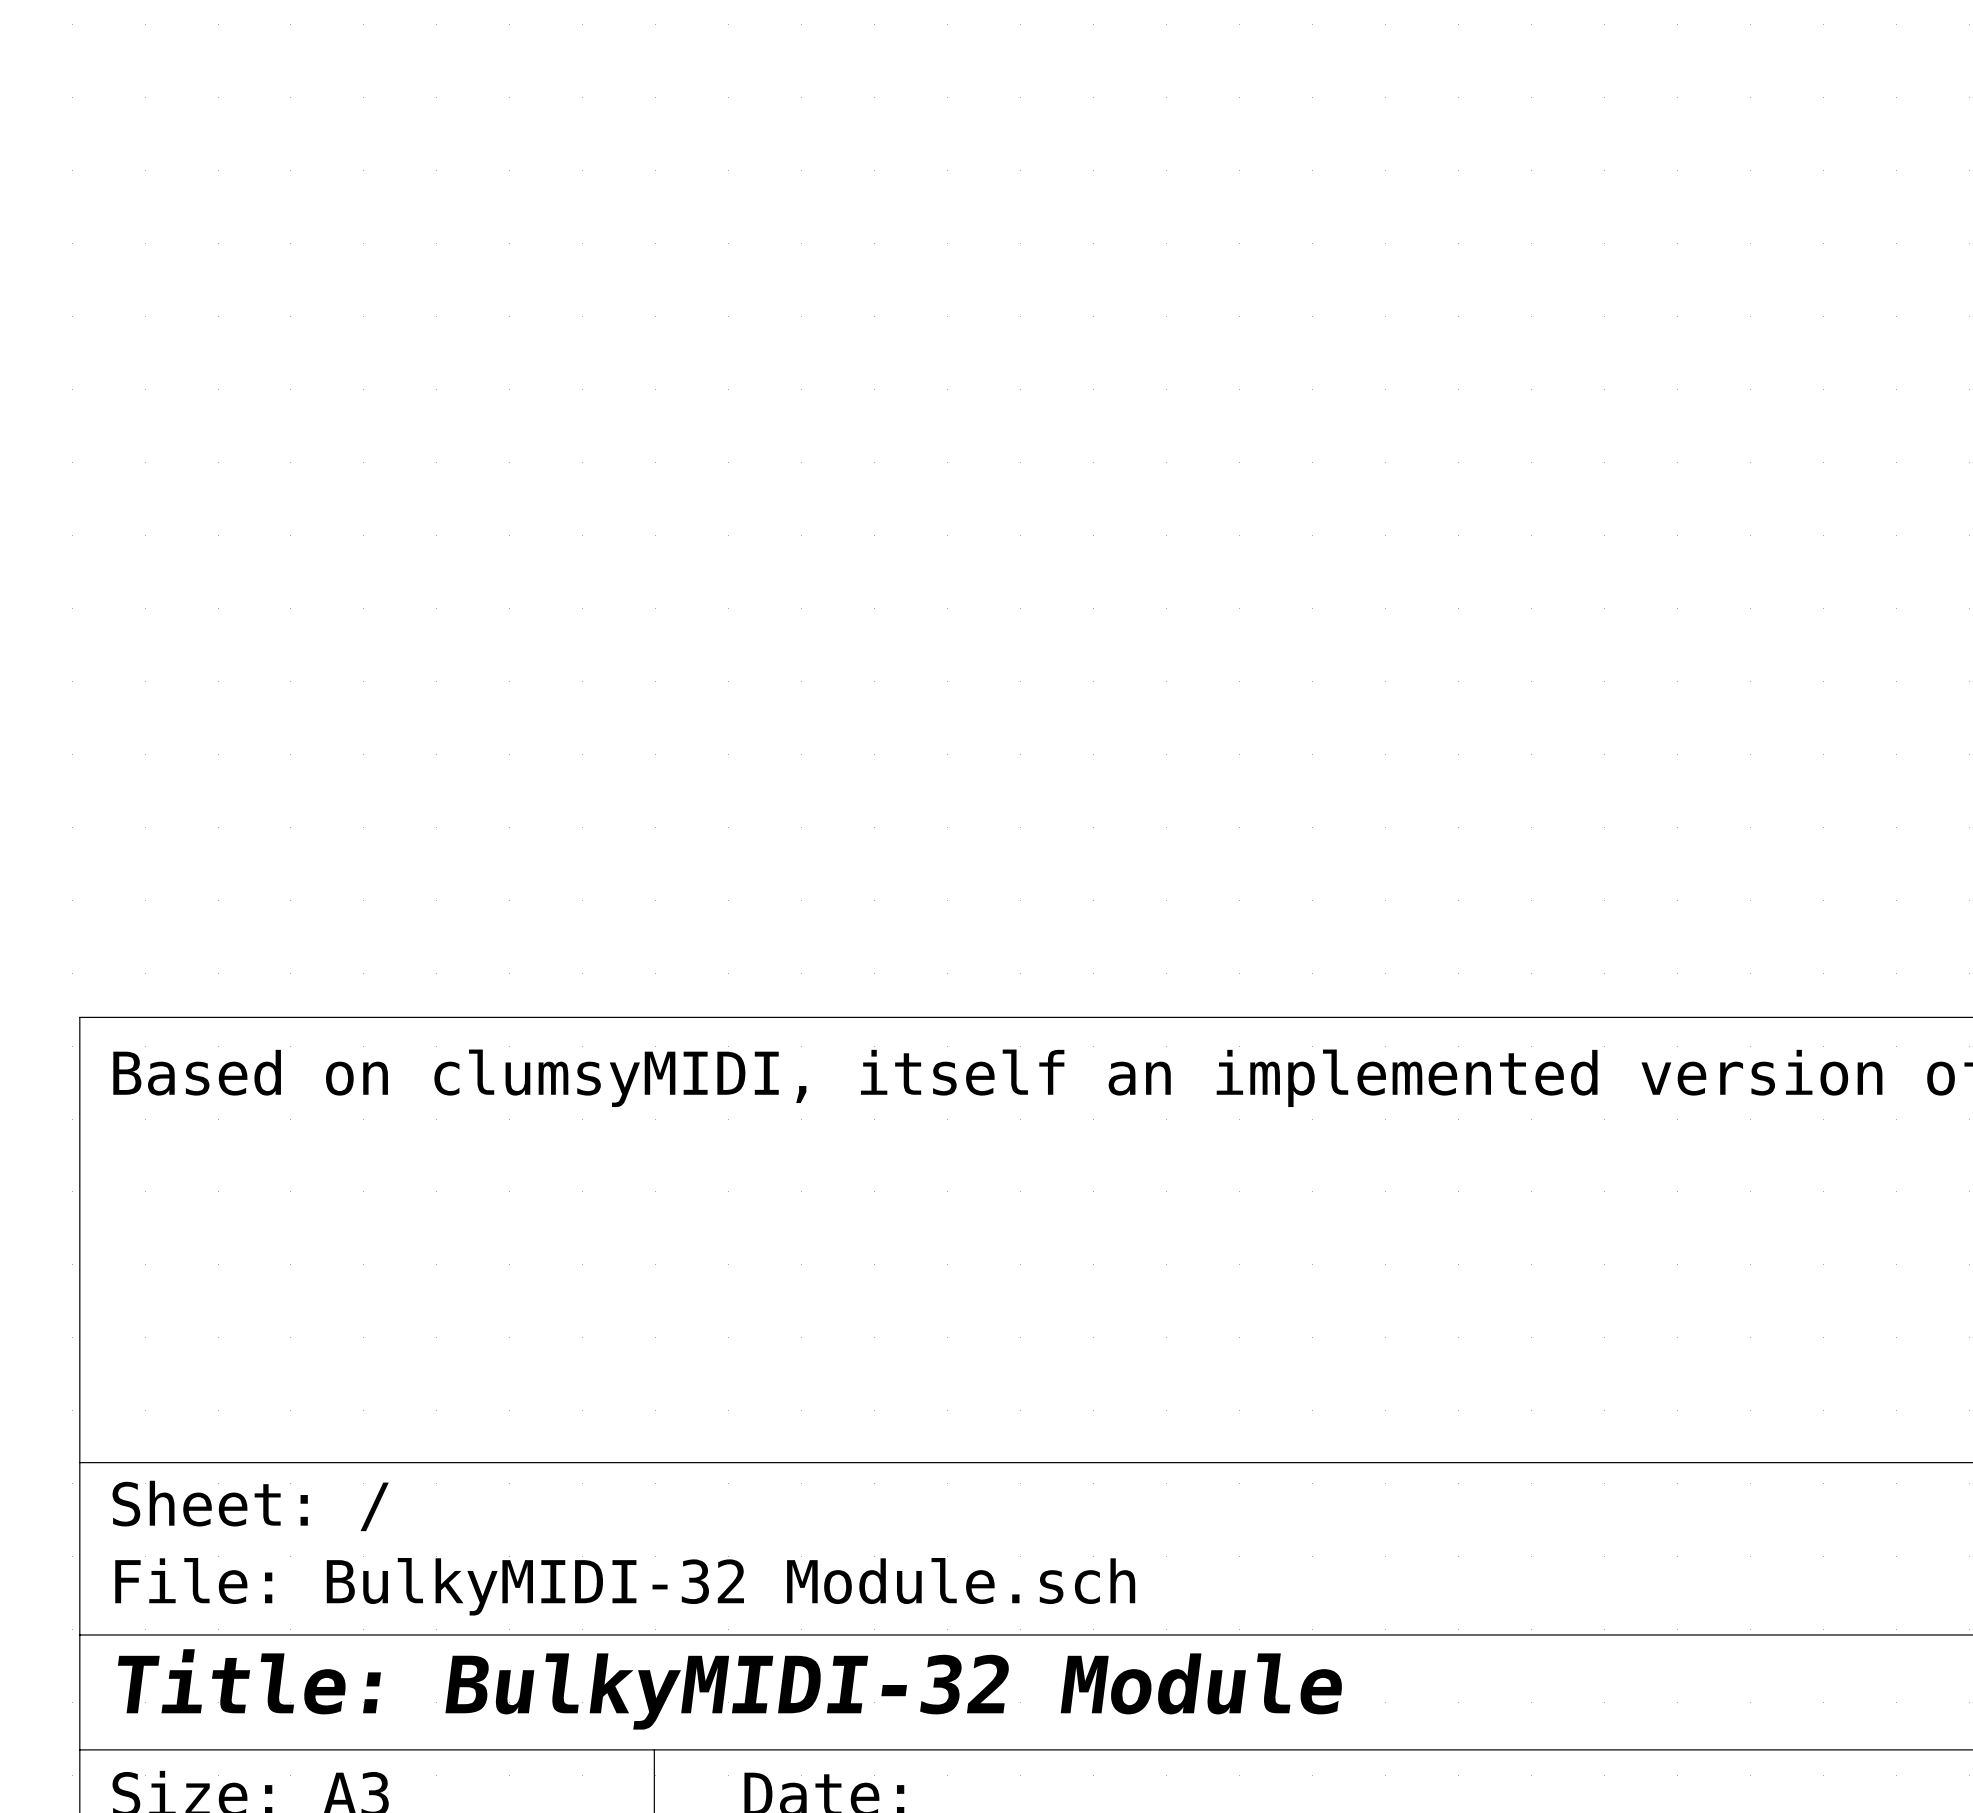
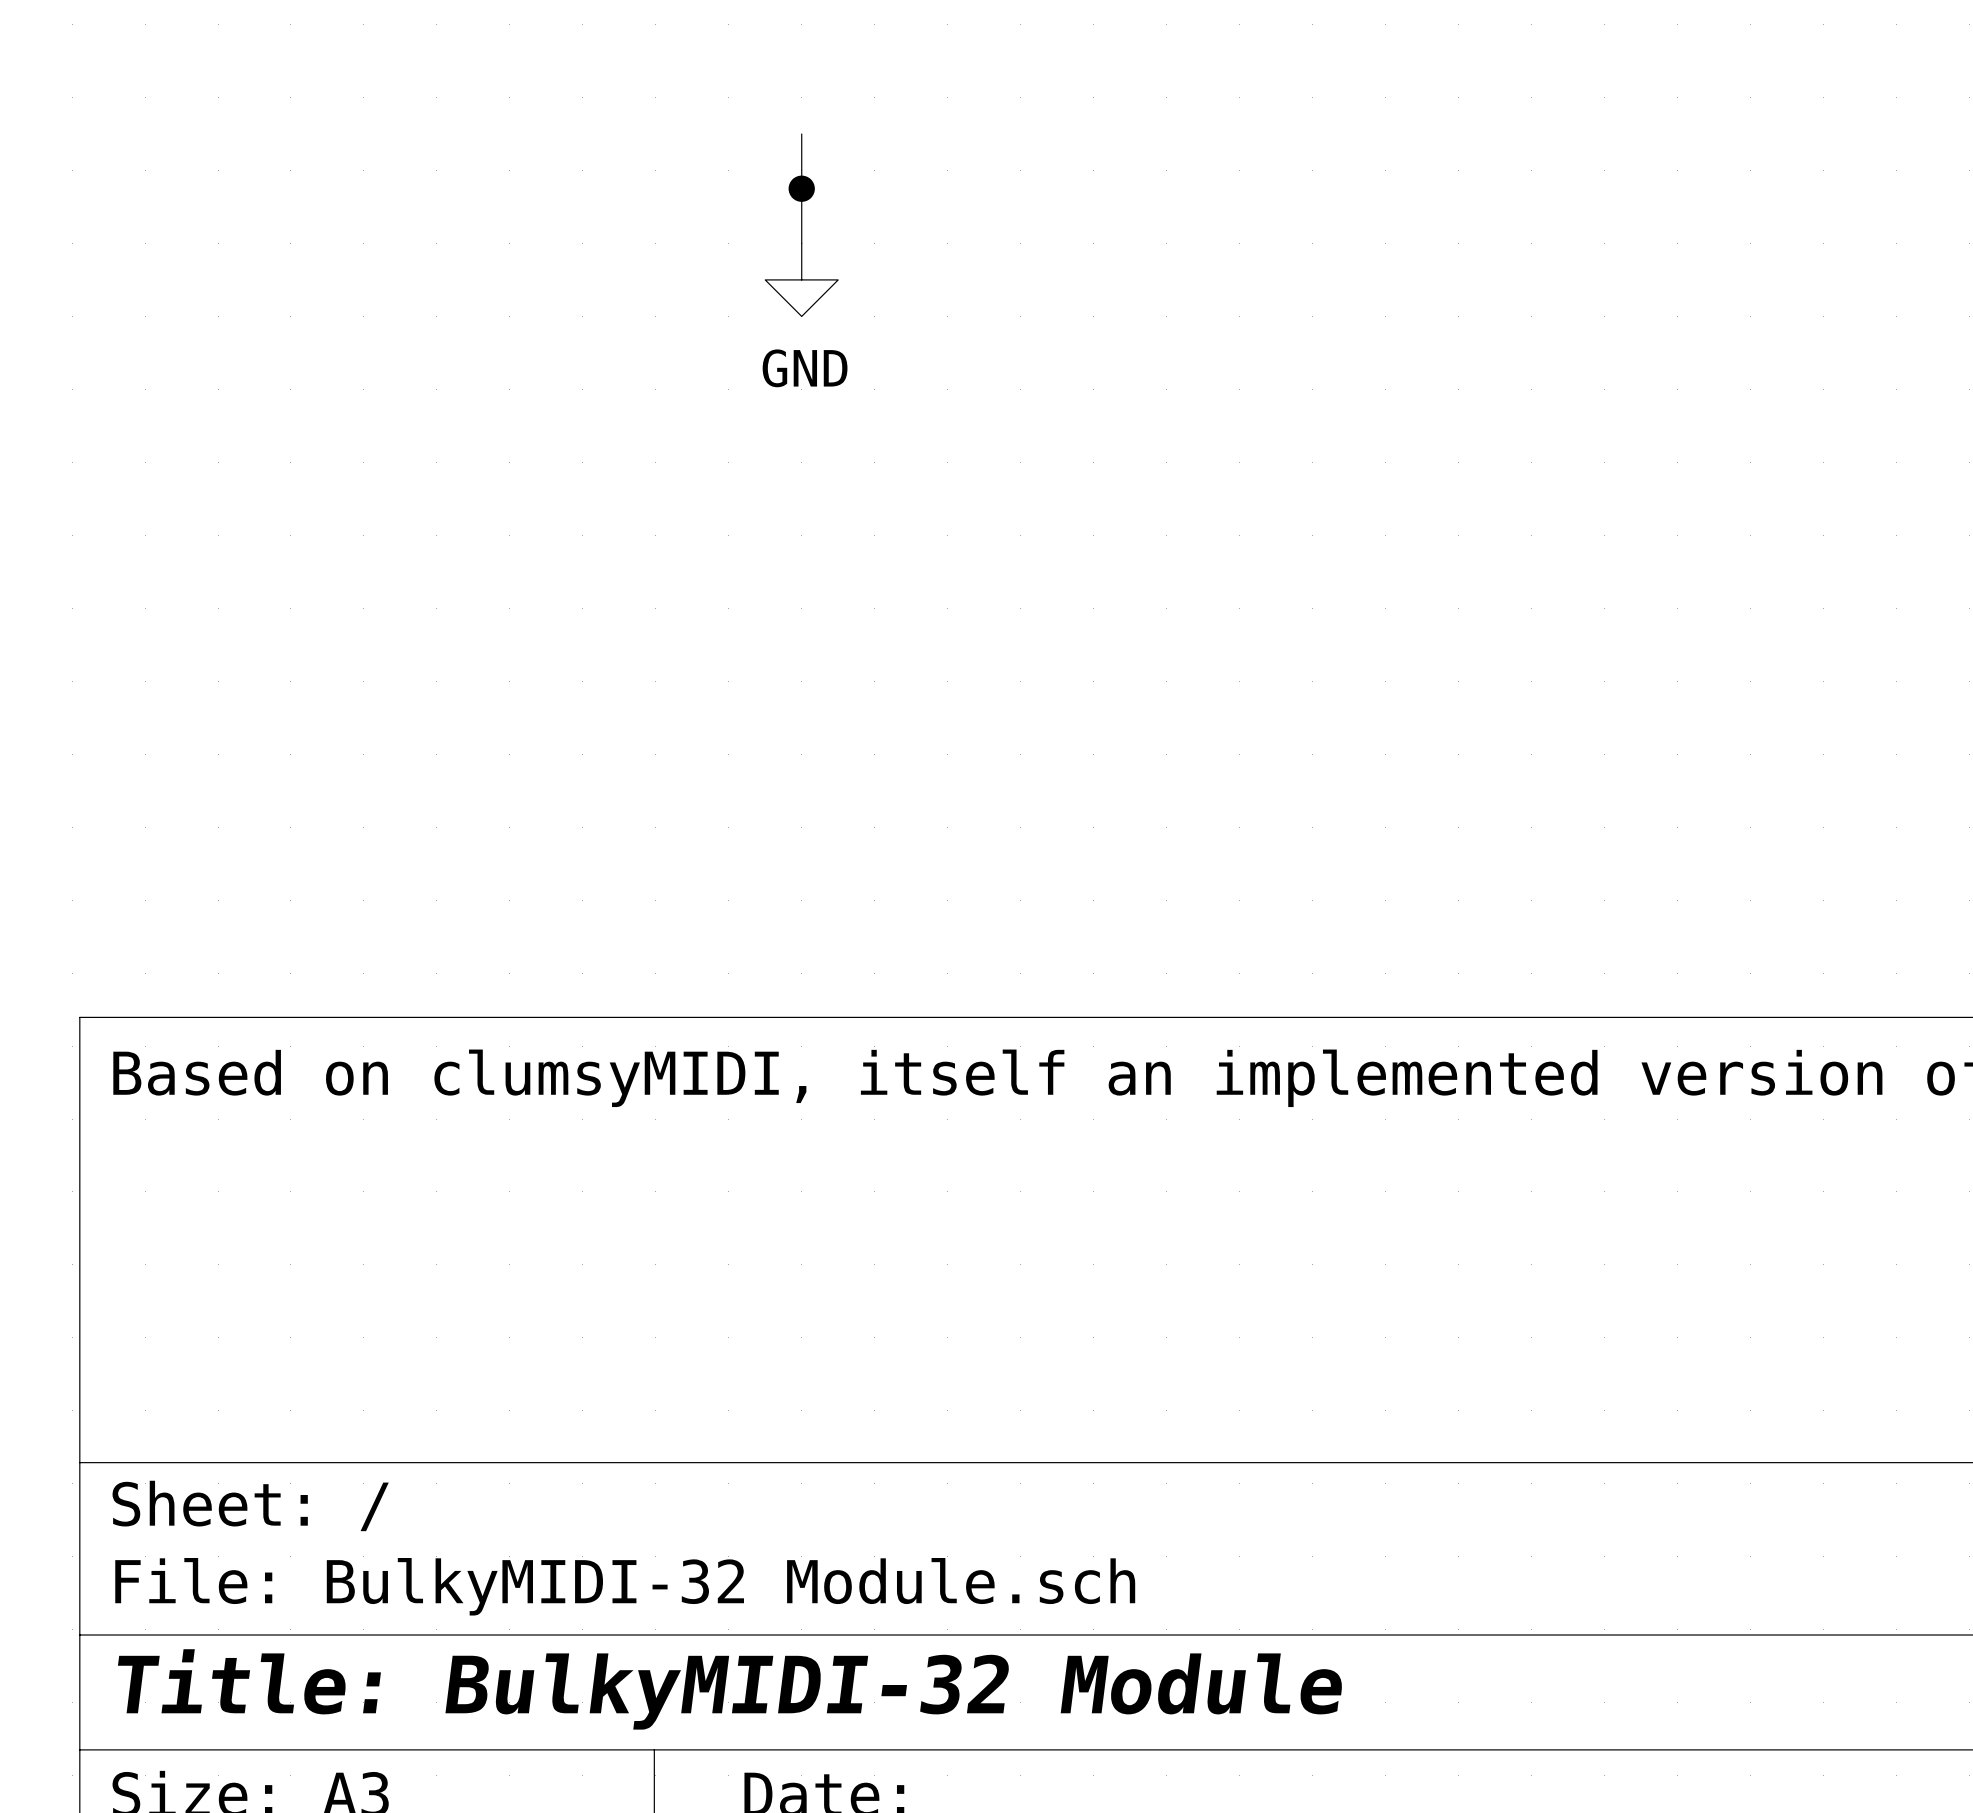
wire: none -> (801, 134) (801, 243)
junction: none -> (801, 188)
power symbol: none -> GND (801, 279)

